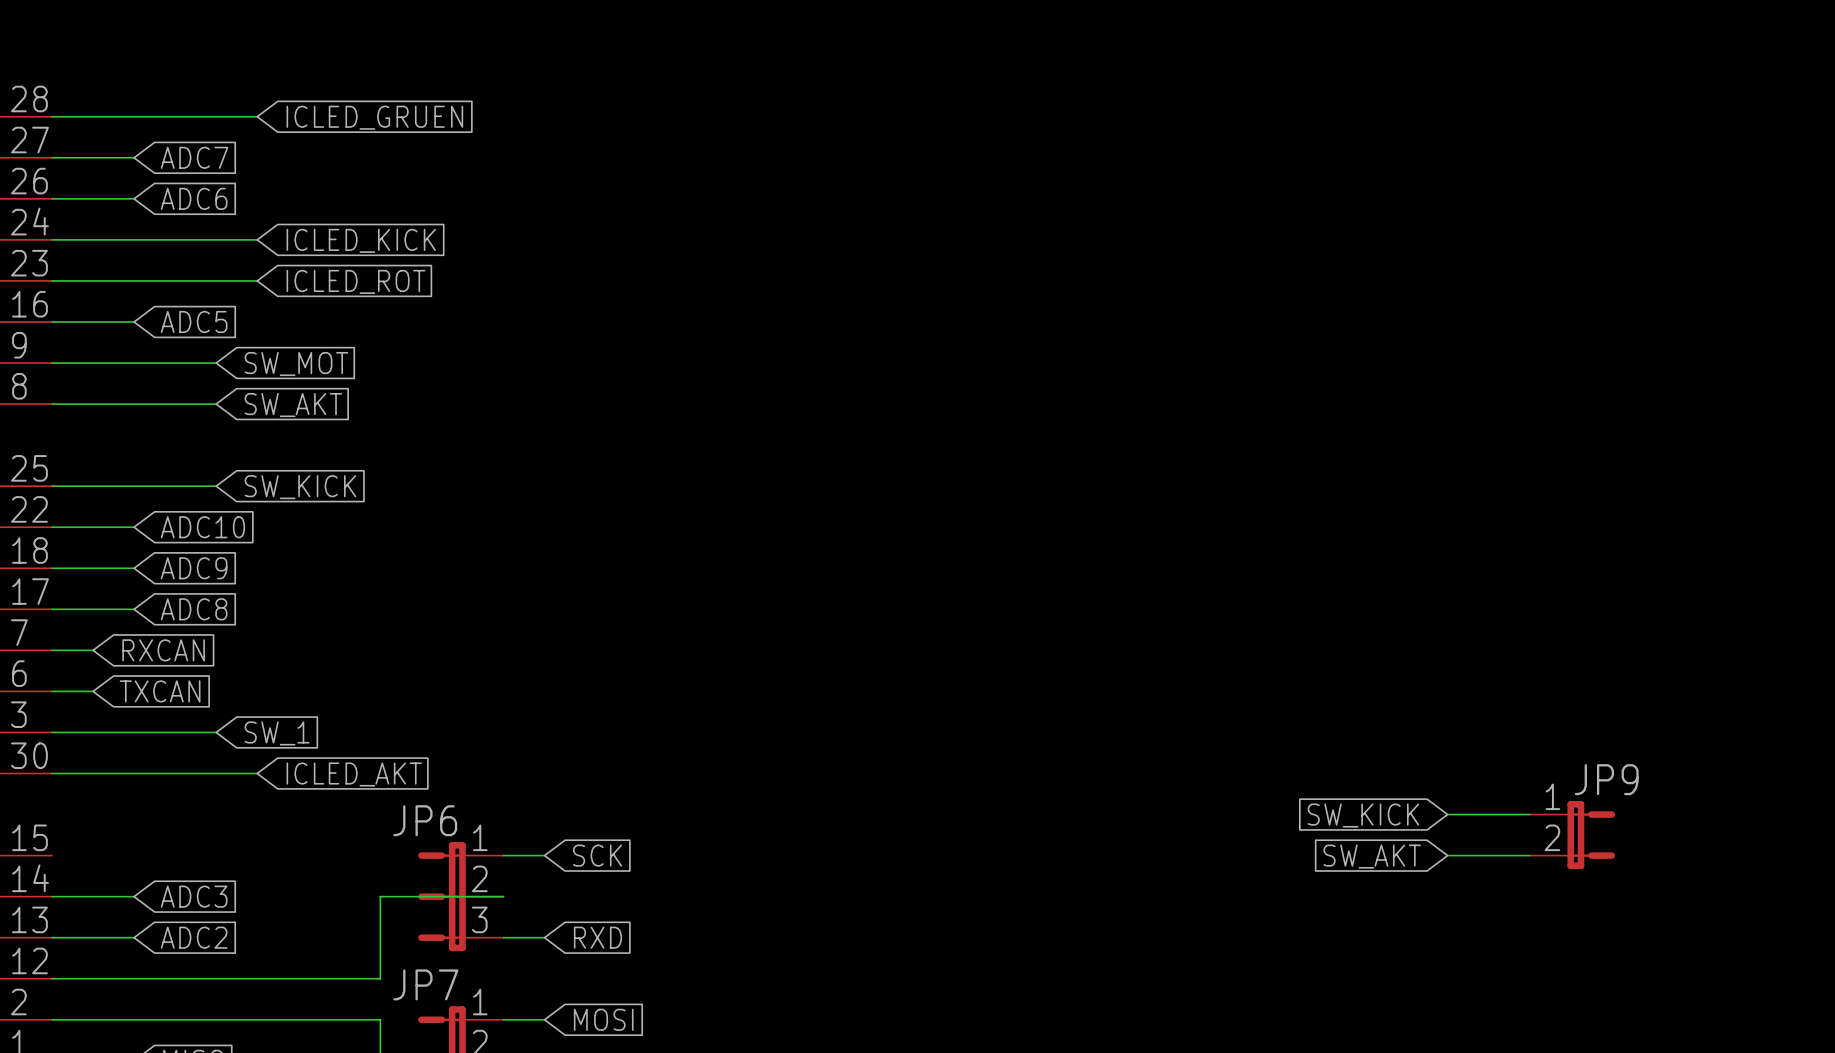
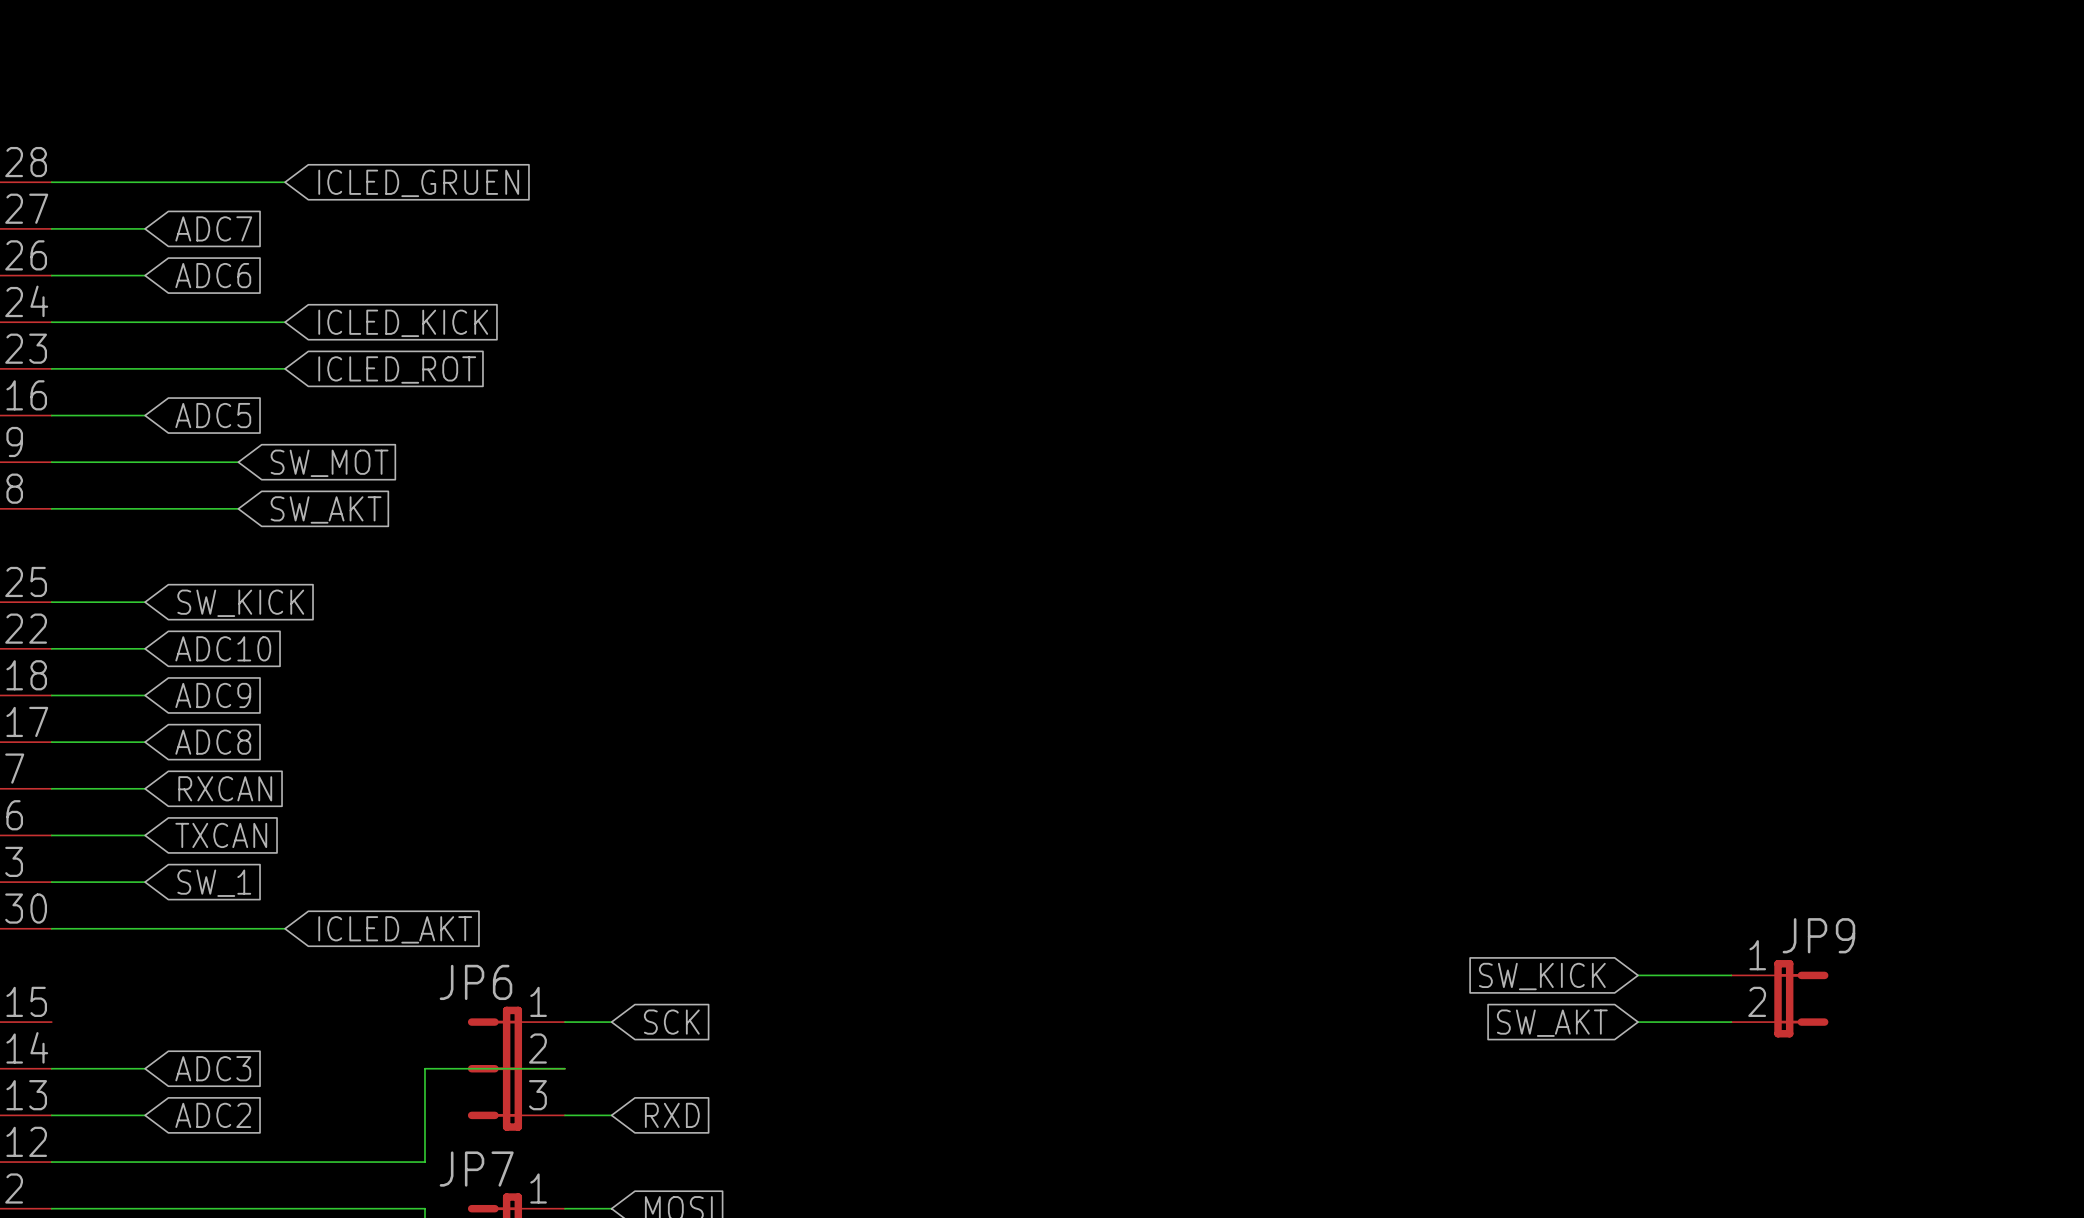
wire: (134, 486) (216, 486) -> none
global label position: SW_KICK (300, 487) -> SW_KICK (240, 603)
wire: none -> (98, 788) (145, 788)
global label position: RXCAN (163, 650) -> RXCAN (225, 788)
wire: none -> (98, 835) (145, 835)
global label position: TXCAN (160, 691) -> TXCAN (221, 835)
wire: (134, 732) (216, 732) -> none
global label position: SW_1 (277, 733) -> SW_1 (214, 883)

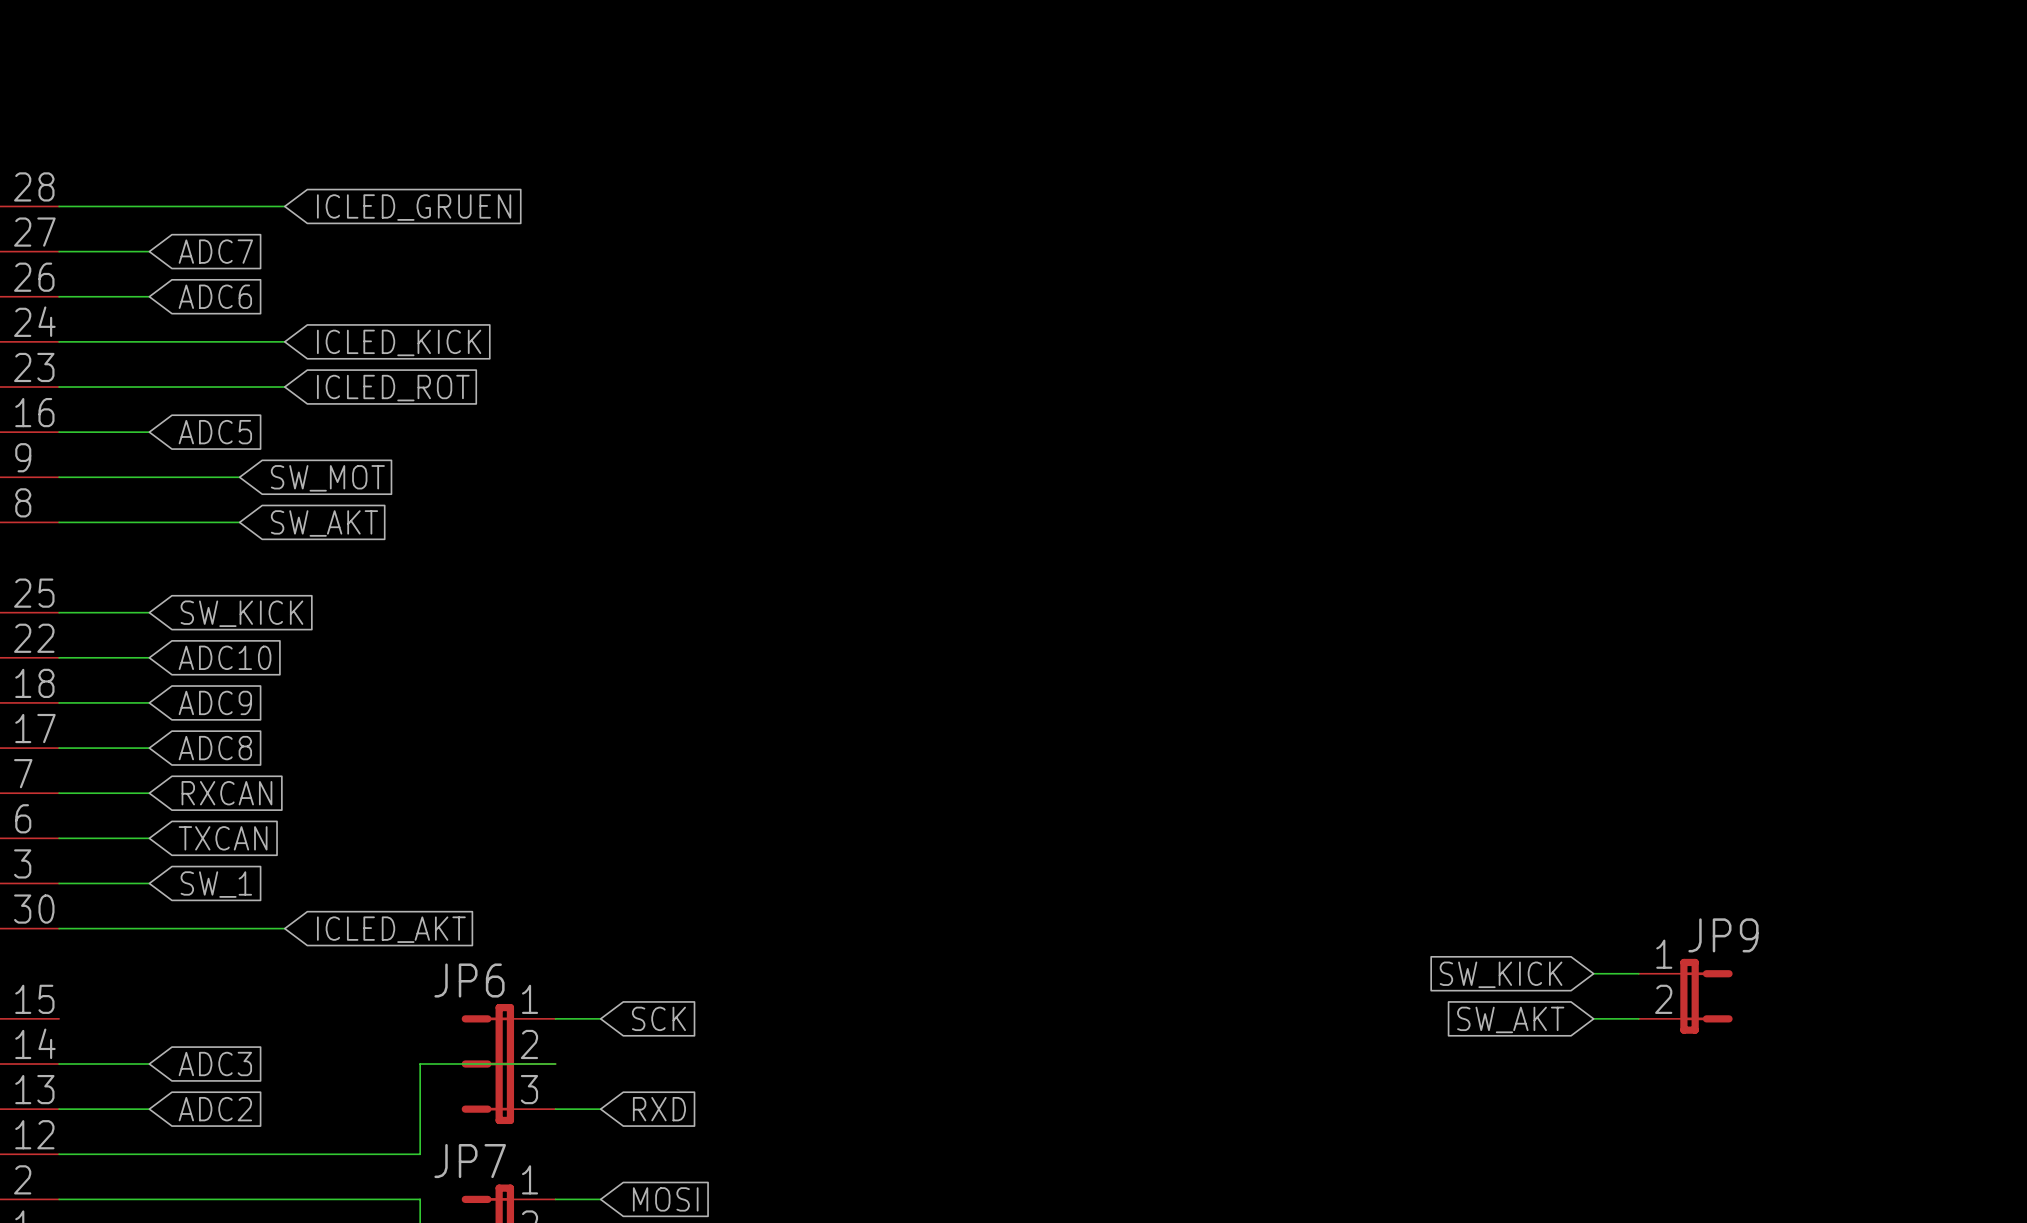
JP9 position: (1779, 998) -> (1685, 996)

